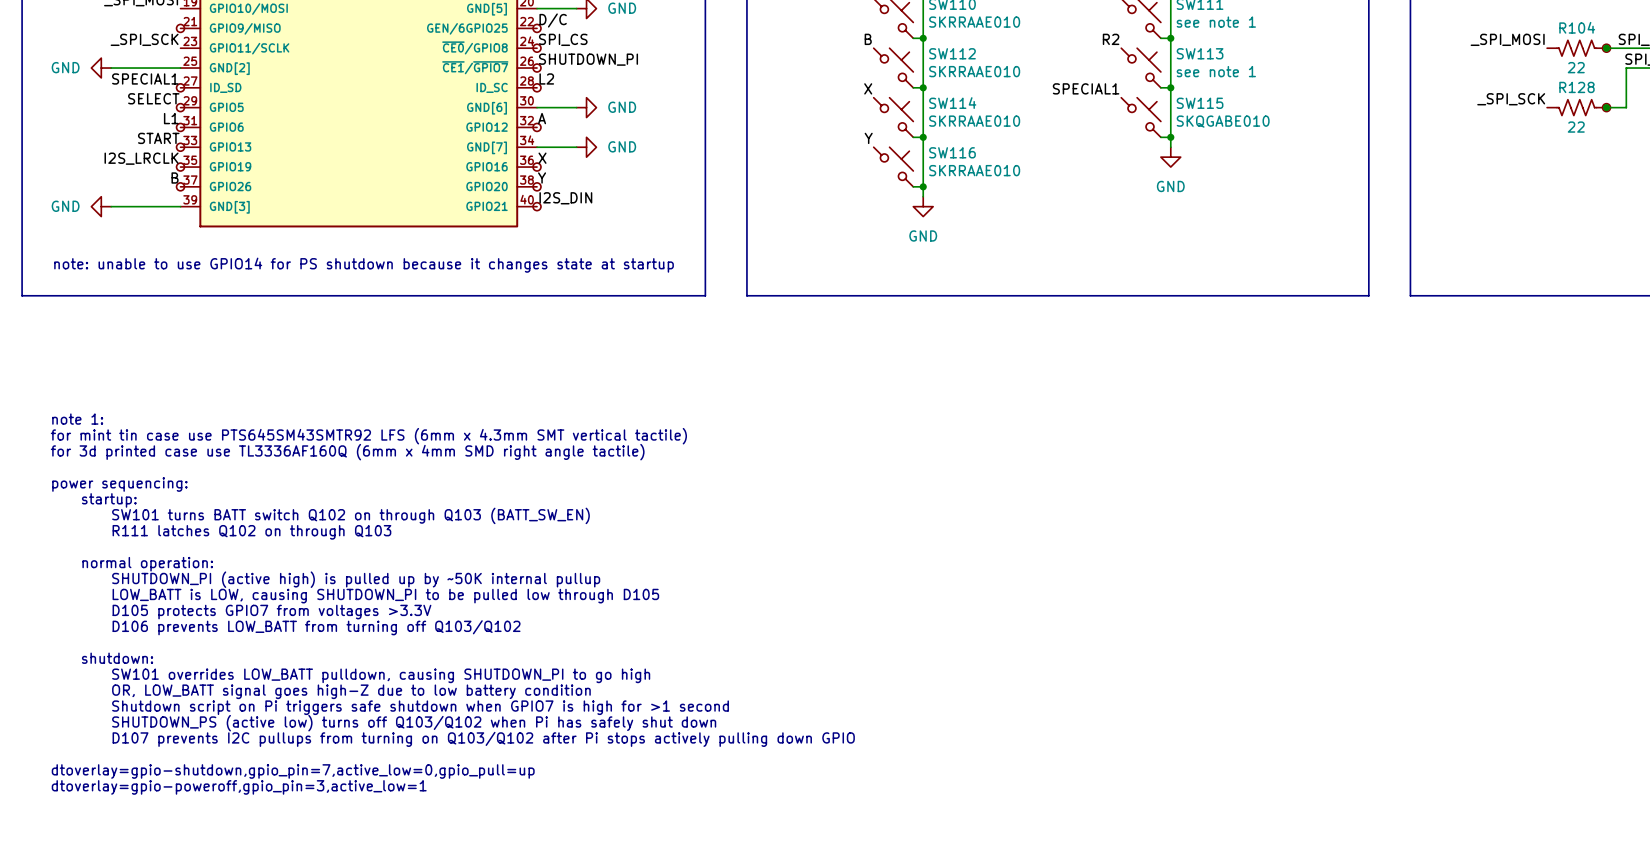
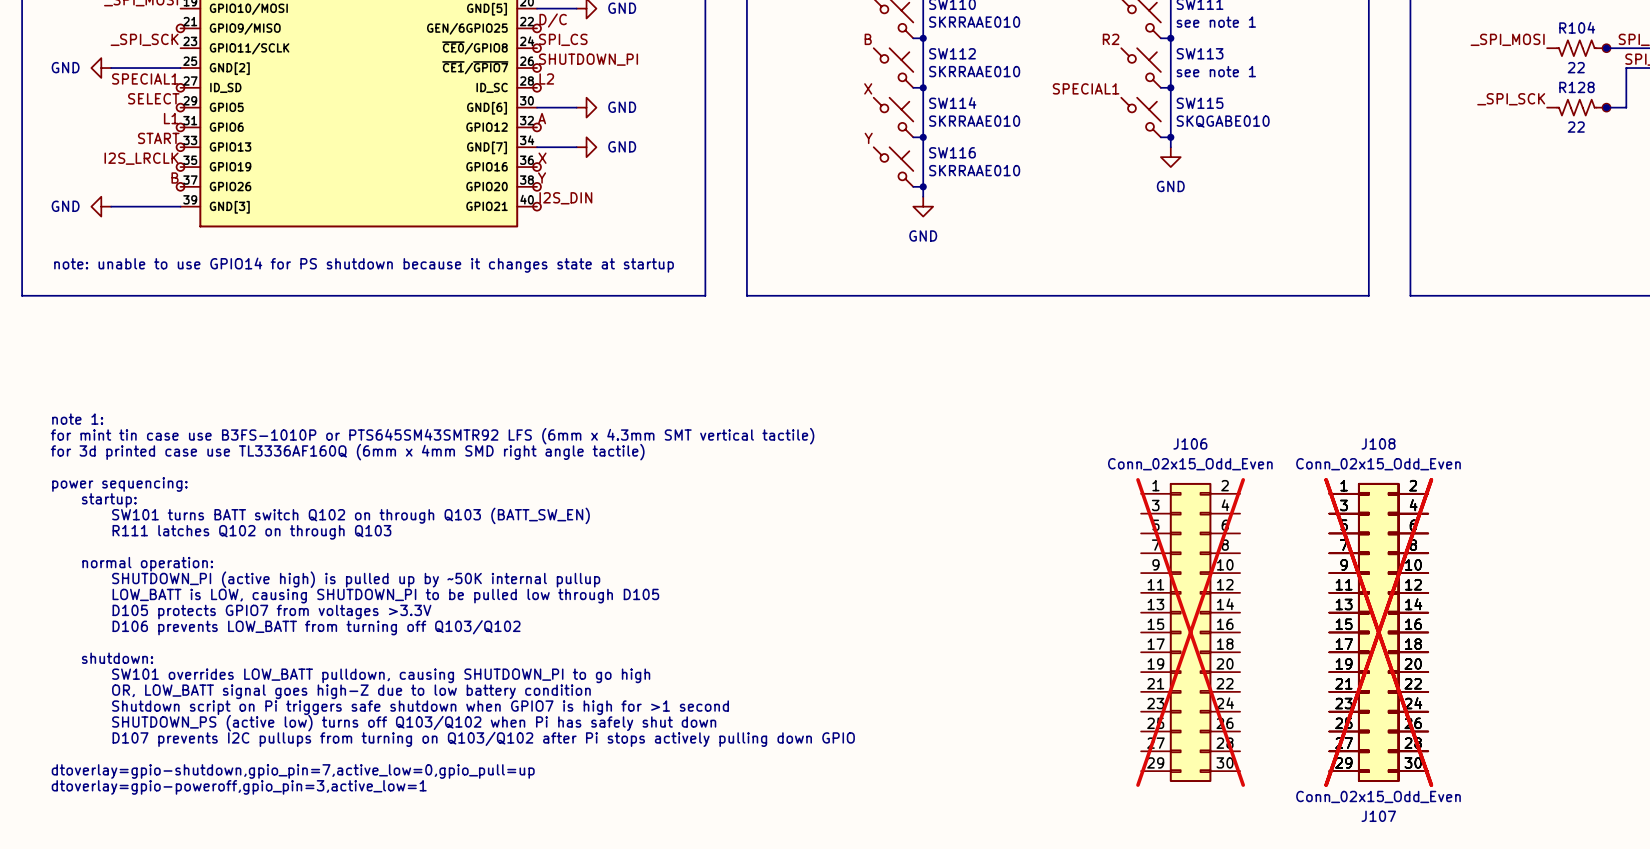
text: for mint tin case use PTS645SM43SMTR92 LFS (6mm x 4.3mm SMT vertical tactile) (368, 436) -> for mint tin case use B3FS-1010P or PTS645SM43SMTR92 LFS (6mm x 4.3mm SMT vertical tactile) (432, 436)
J106: none -> Conn_02x15_Odd_Even (1190, 632)
J107: none -> Conn_02x15_Odd_Even (1378, 632)
J108: none -> Conn_02x15_Odd_Even (1378, 632)

